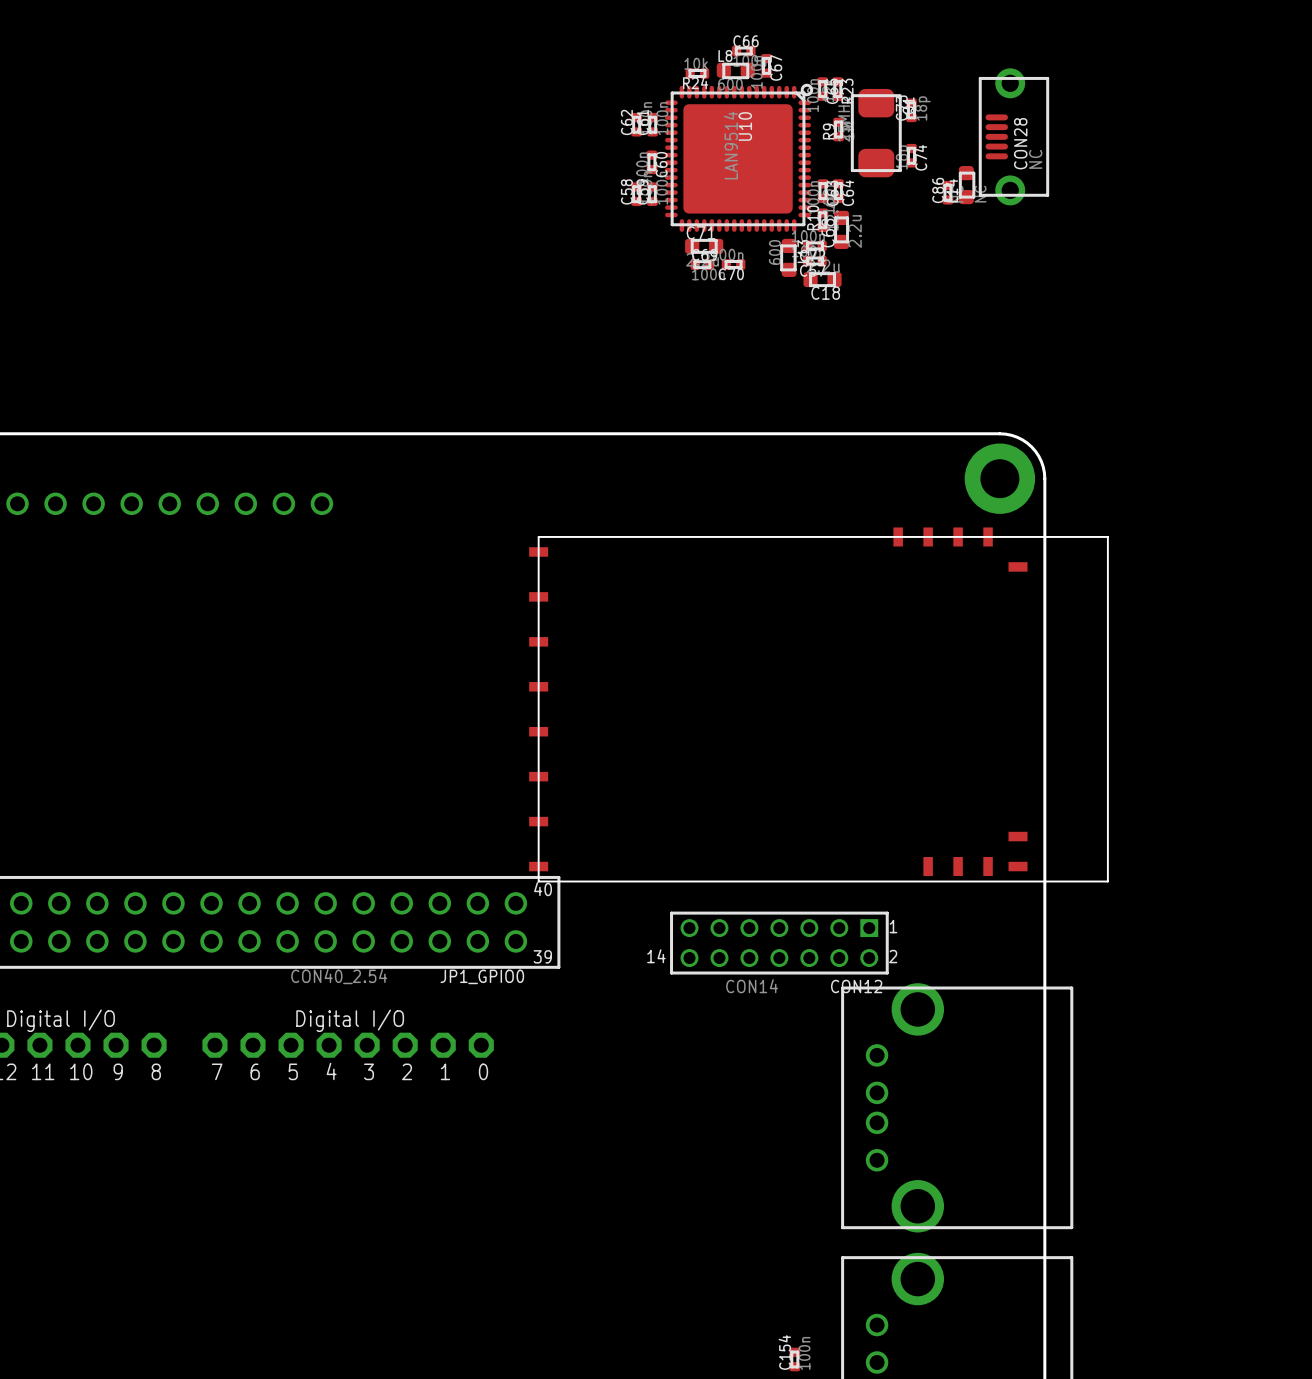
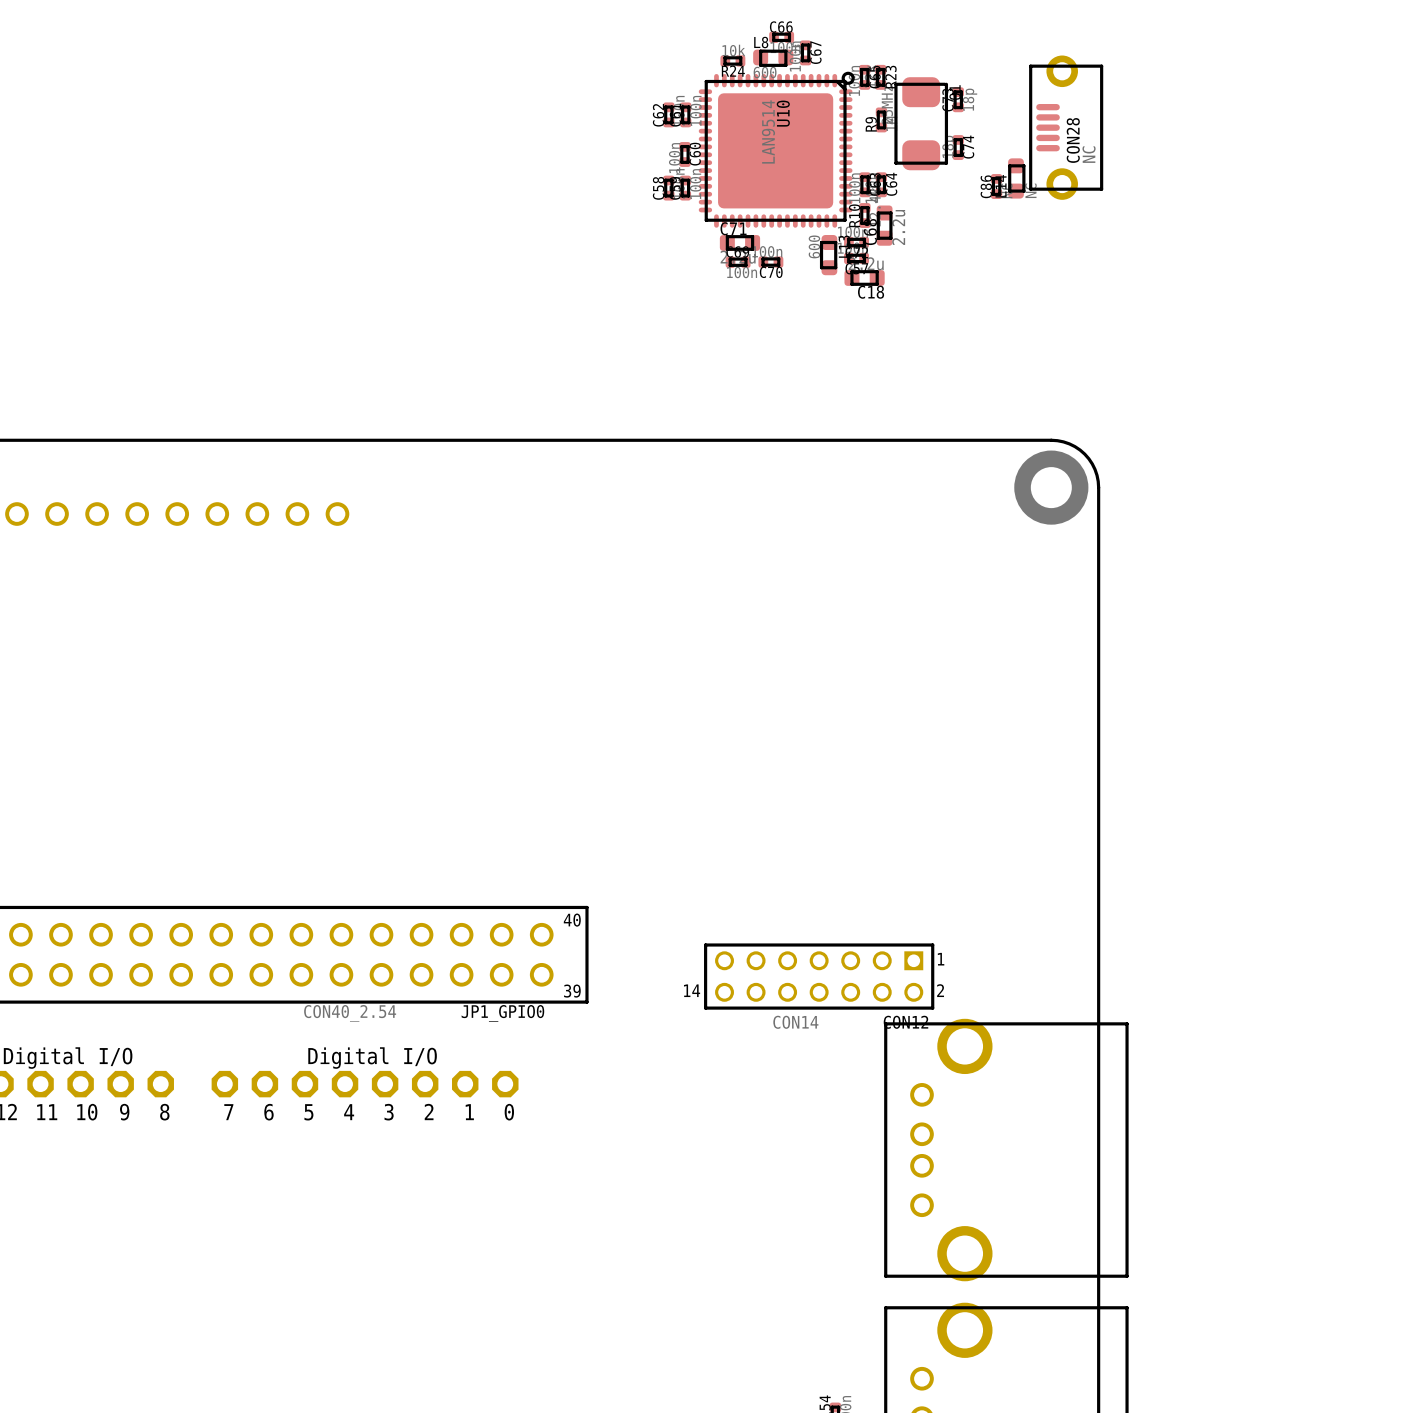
part: (819, 704) -> none

